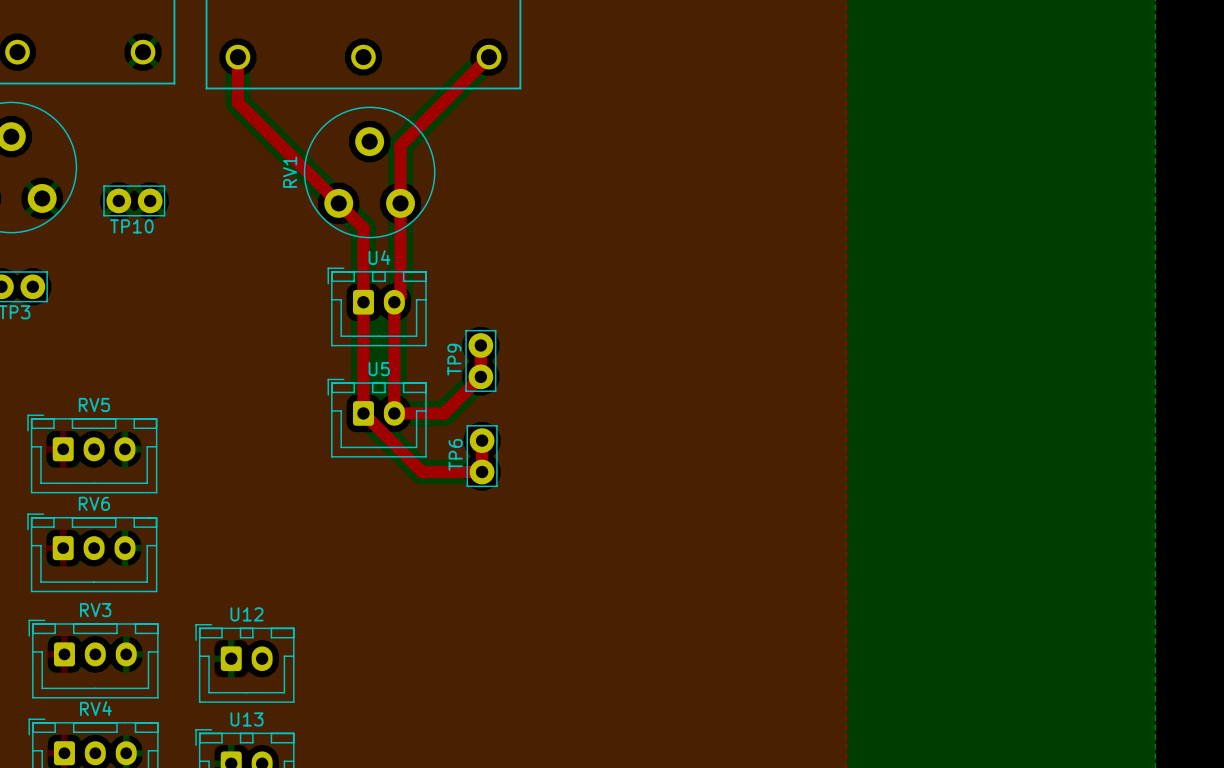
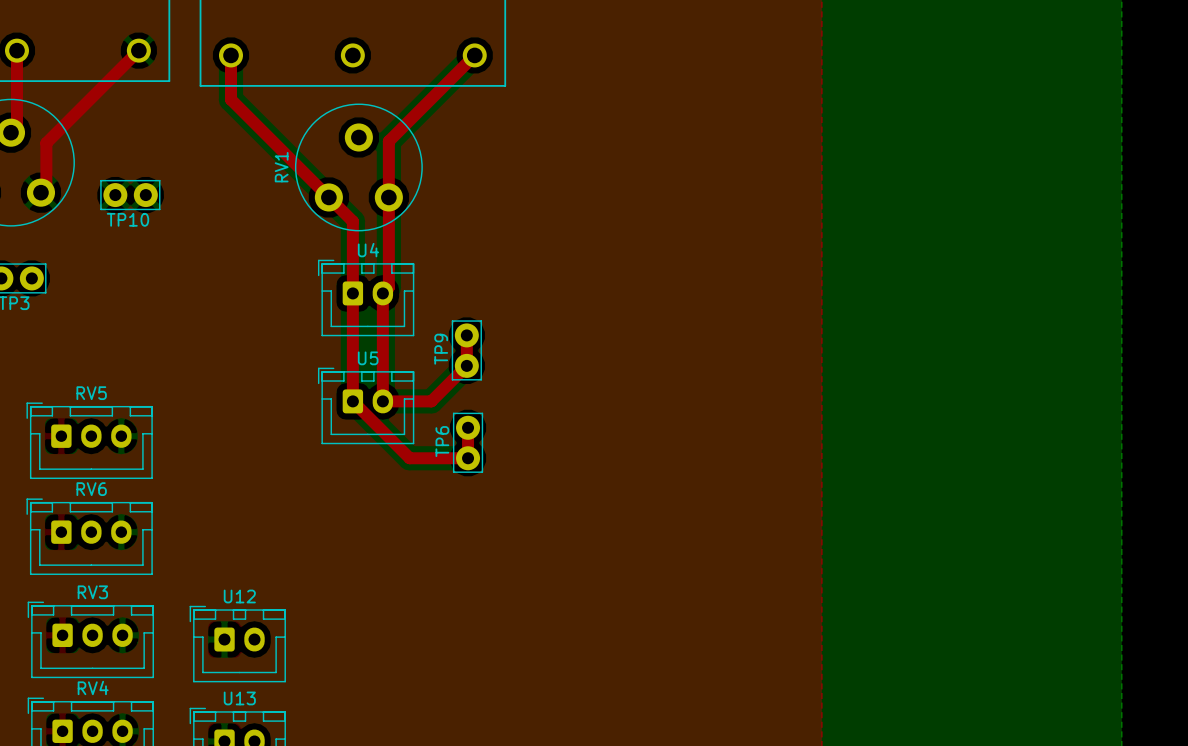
top track: none -> (16, 50) (16, 132)
top track: none -> (138, 50) (46, 143) (46, 192)

